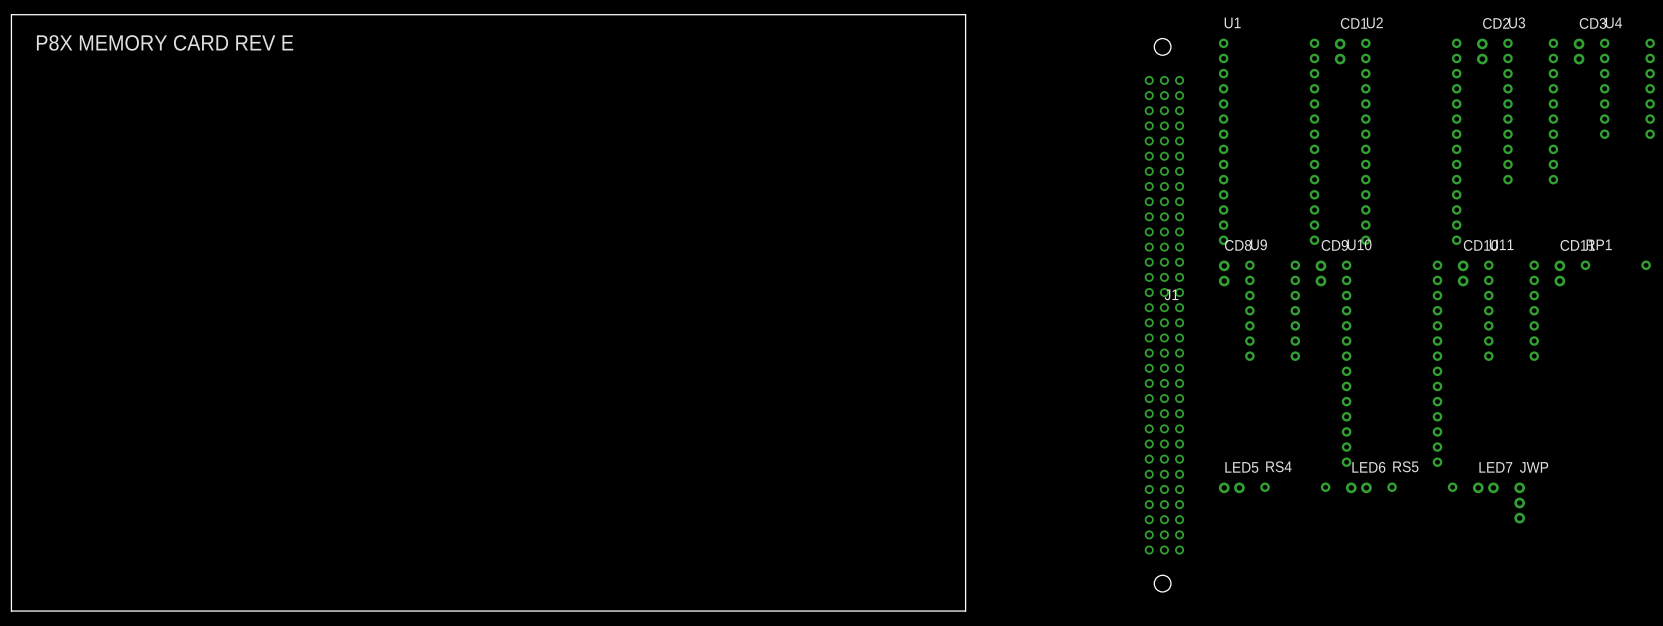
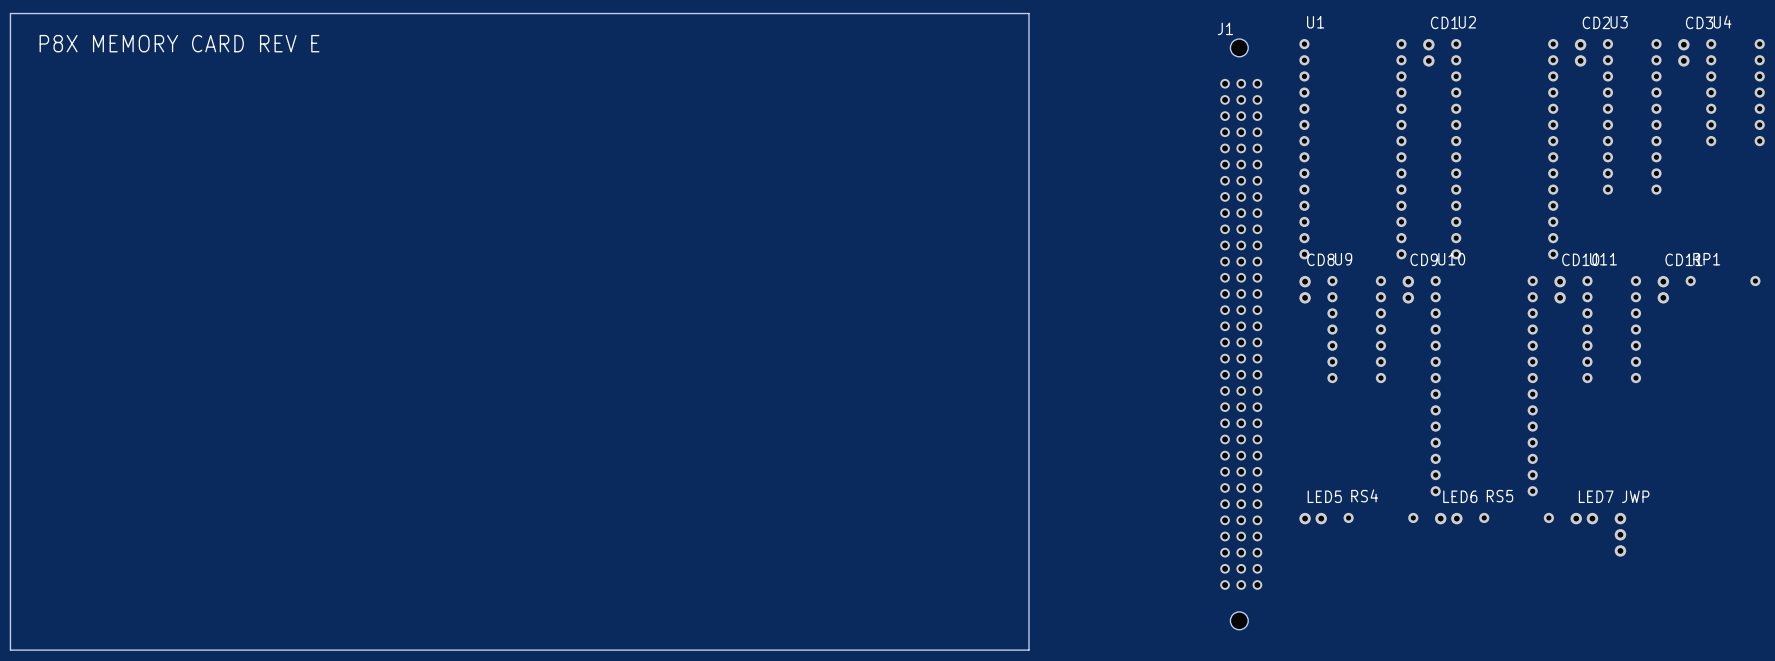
J1 name position: J1 (1171, 294) -> J1 (1225, 28)

